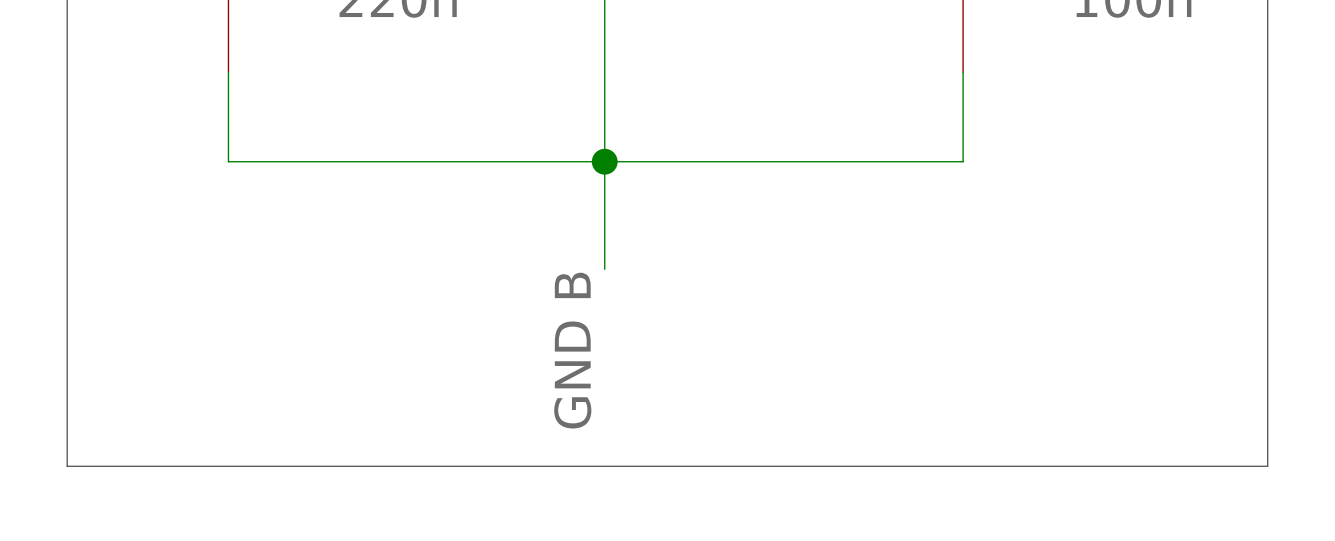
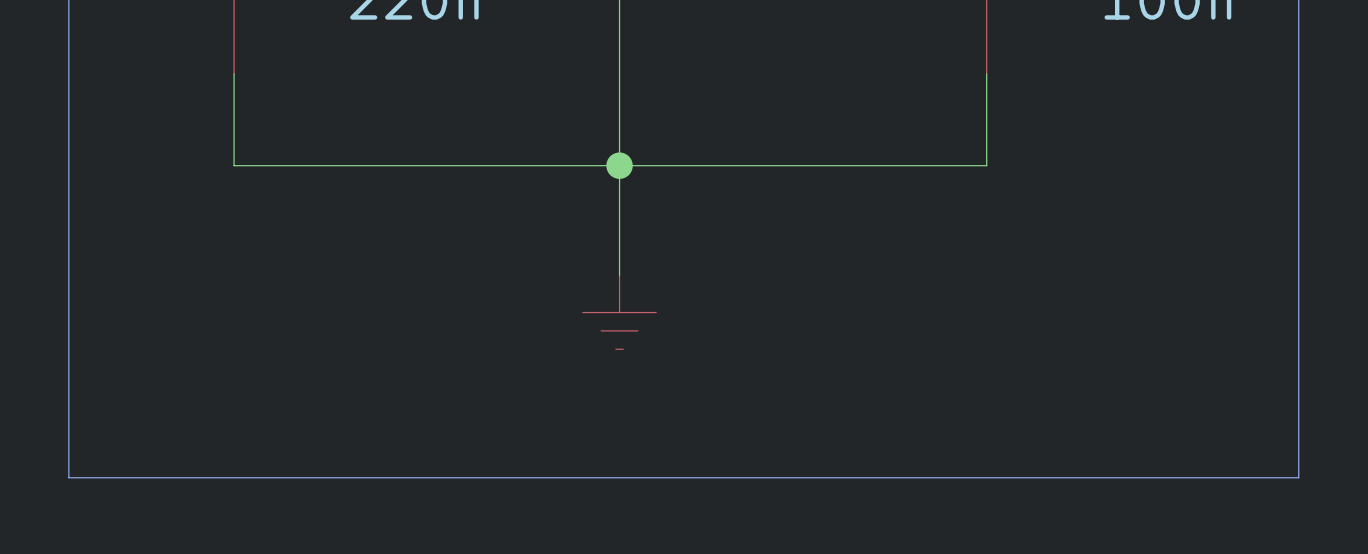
power symbol: none -> (619, 312)
label: GND B (572, 350) -> none

